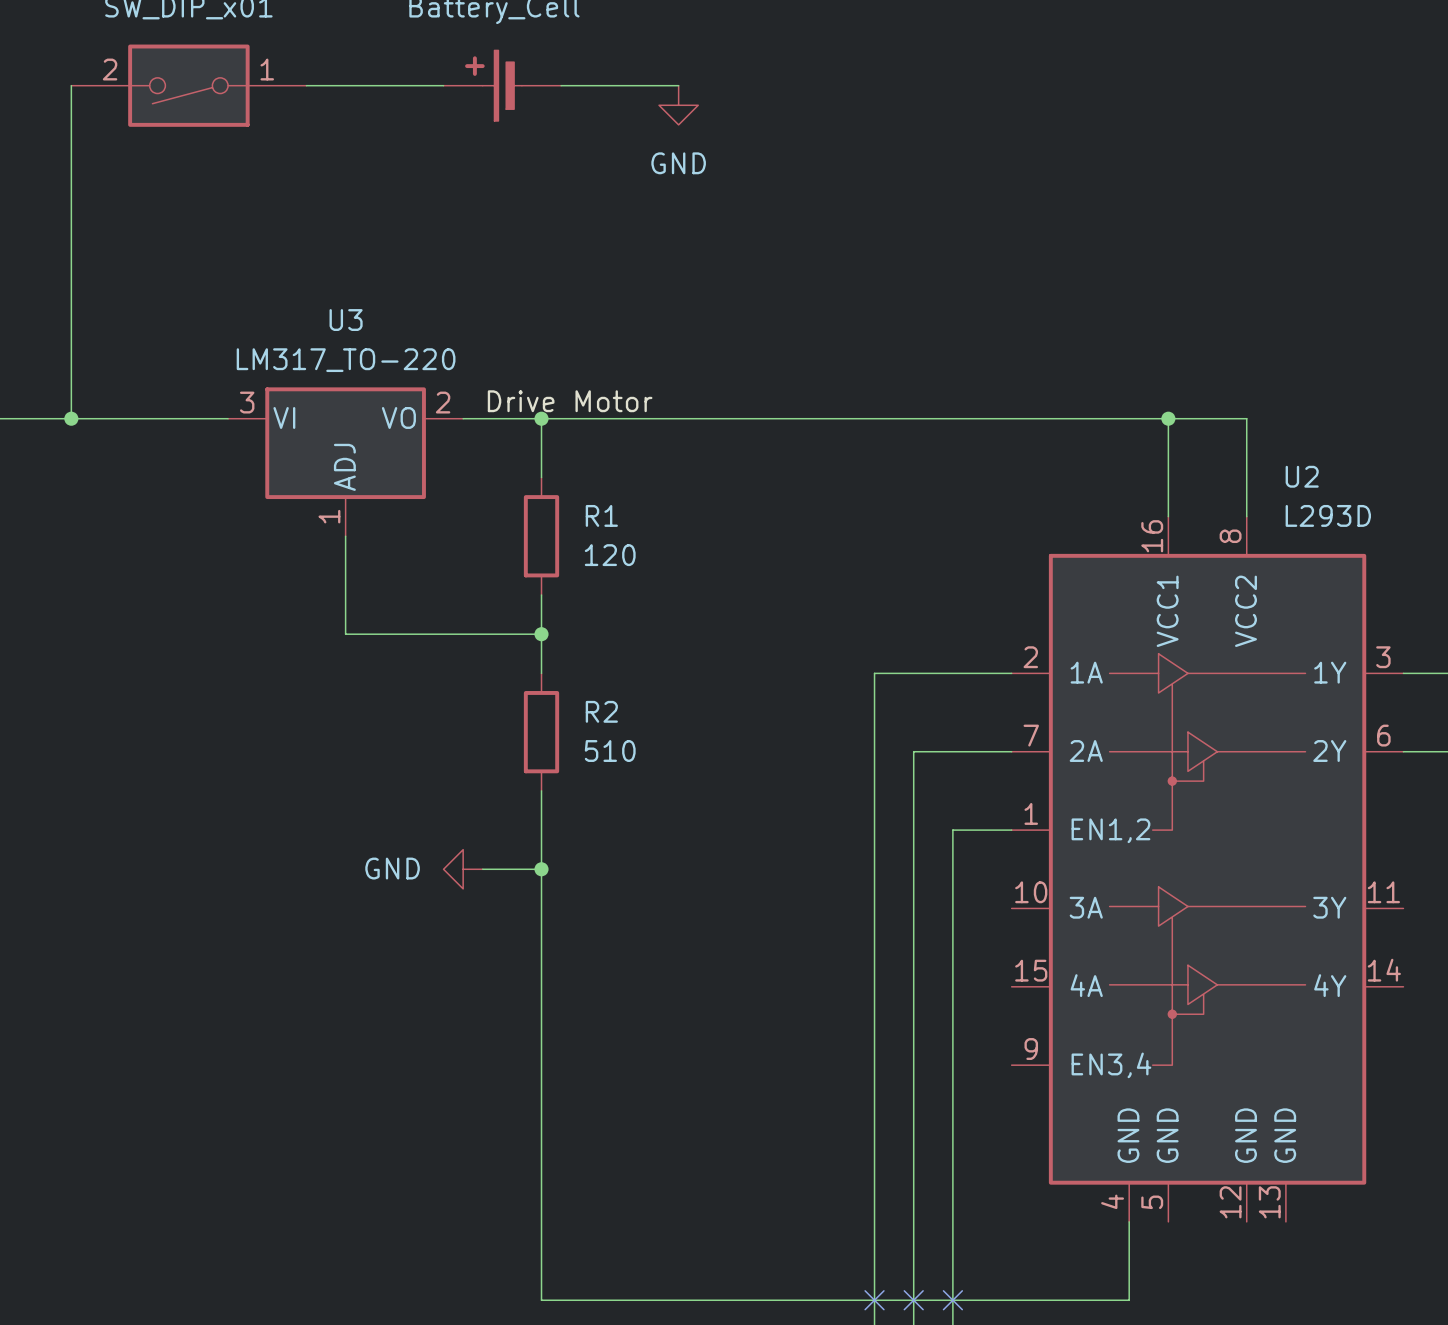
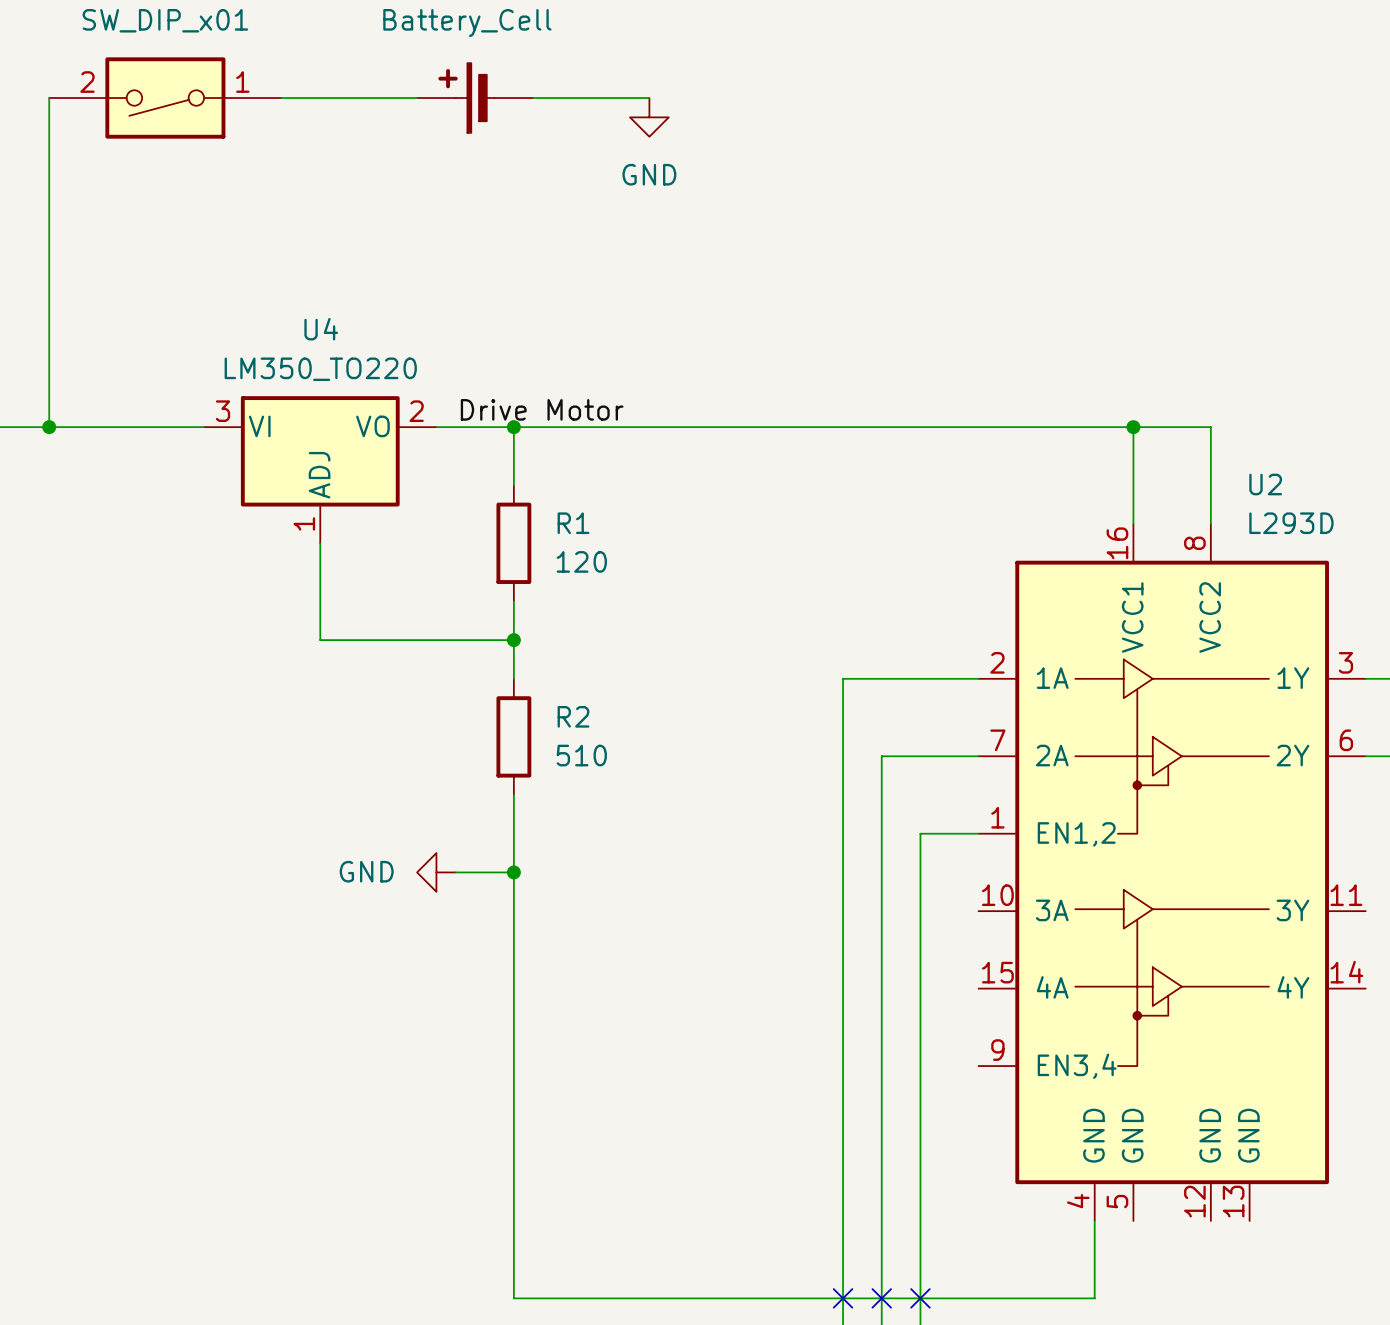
U3 name: U3 (346, 320) -> U4 (321, 329)
U3 value: LM317_TO-220 (346, 360) -> LM350_TO220 (320, 369)

